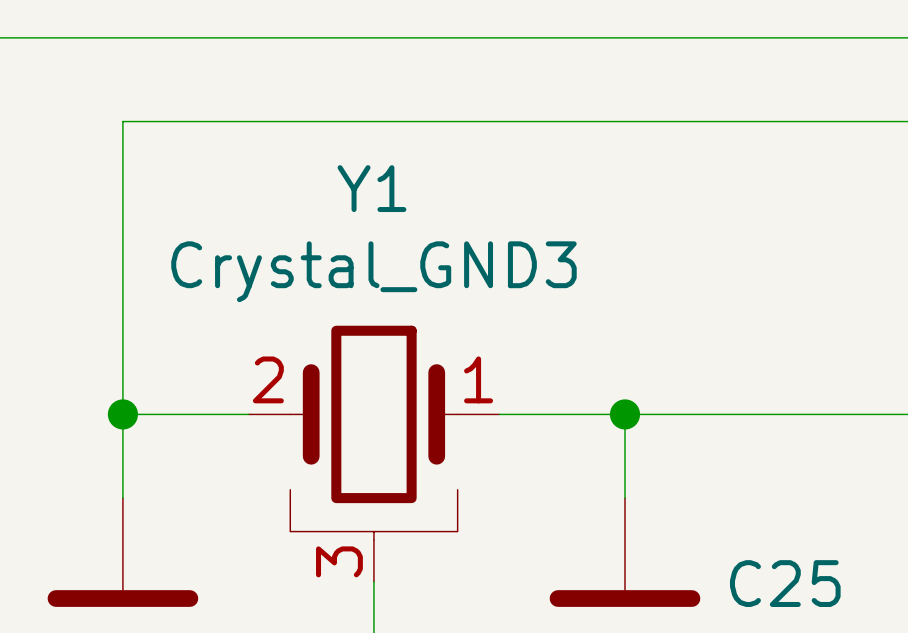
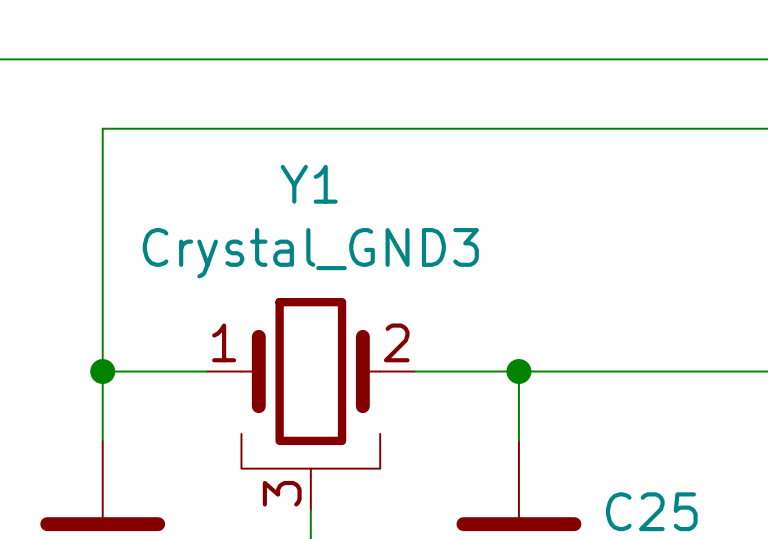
Y1 flip: as is (373, 432) -> left-right (310, 386)

